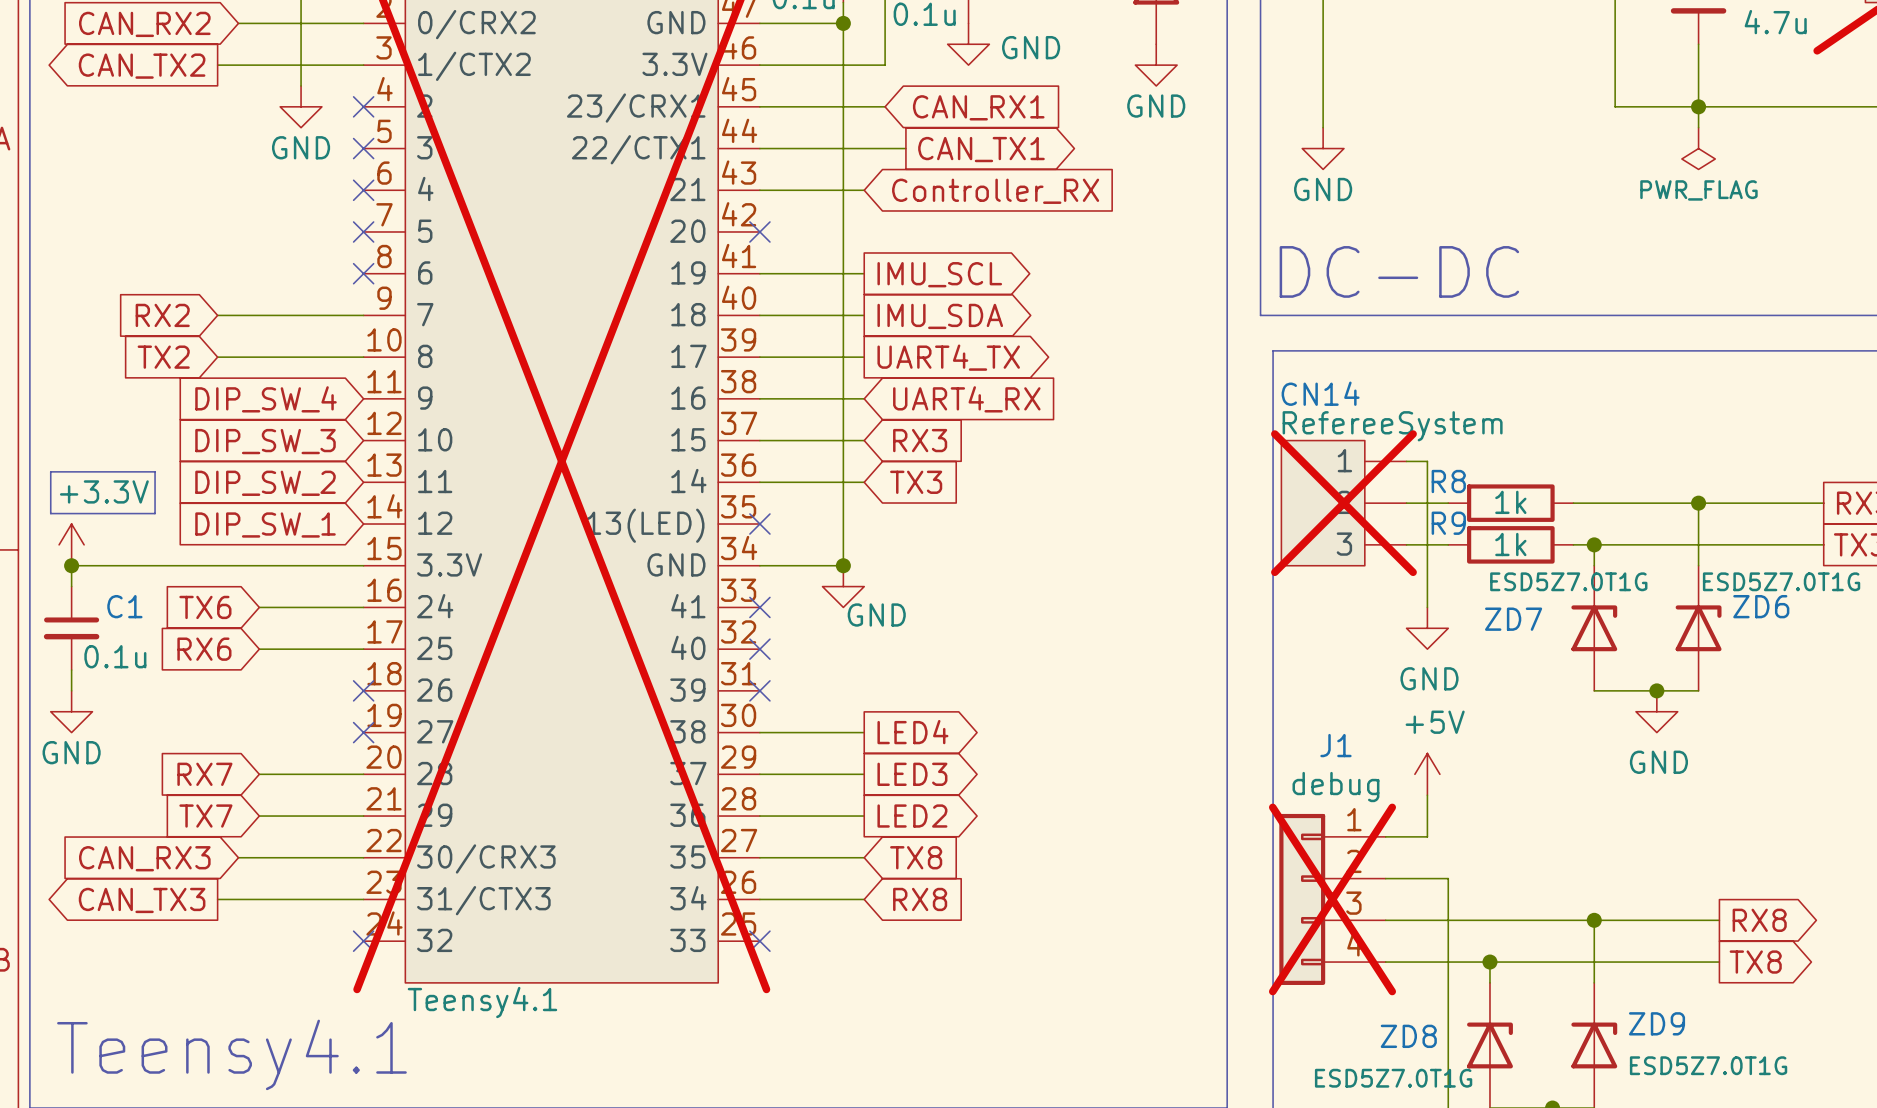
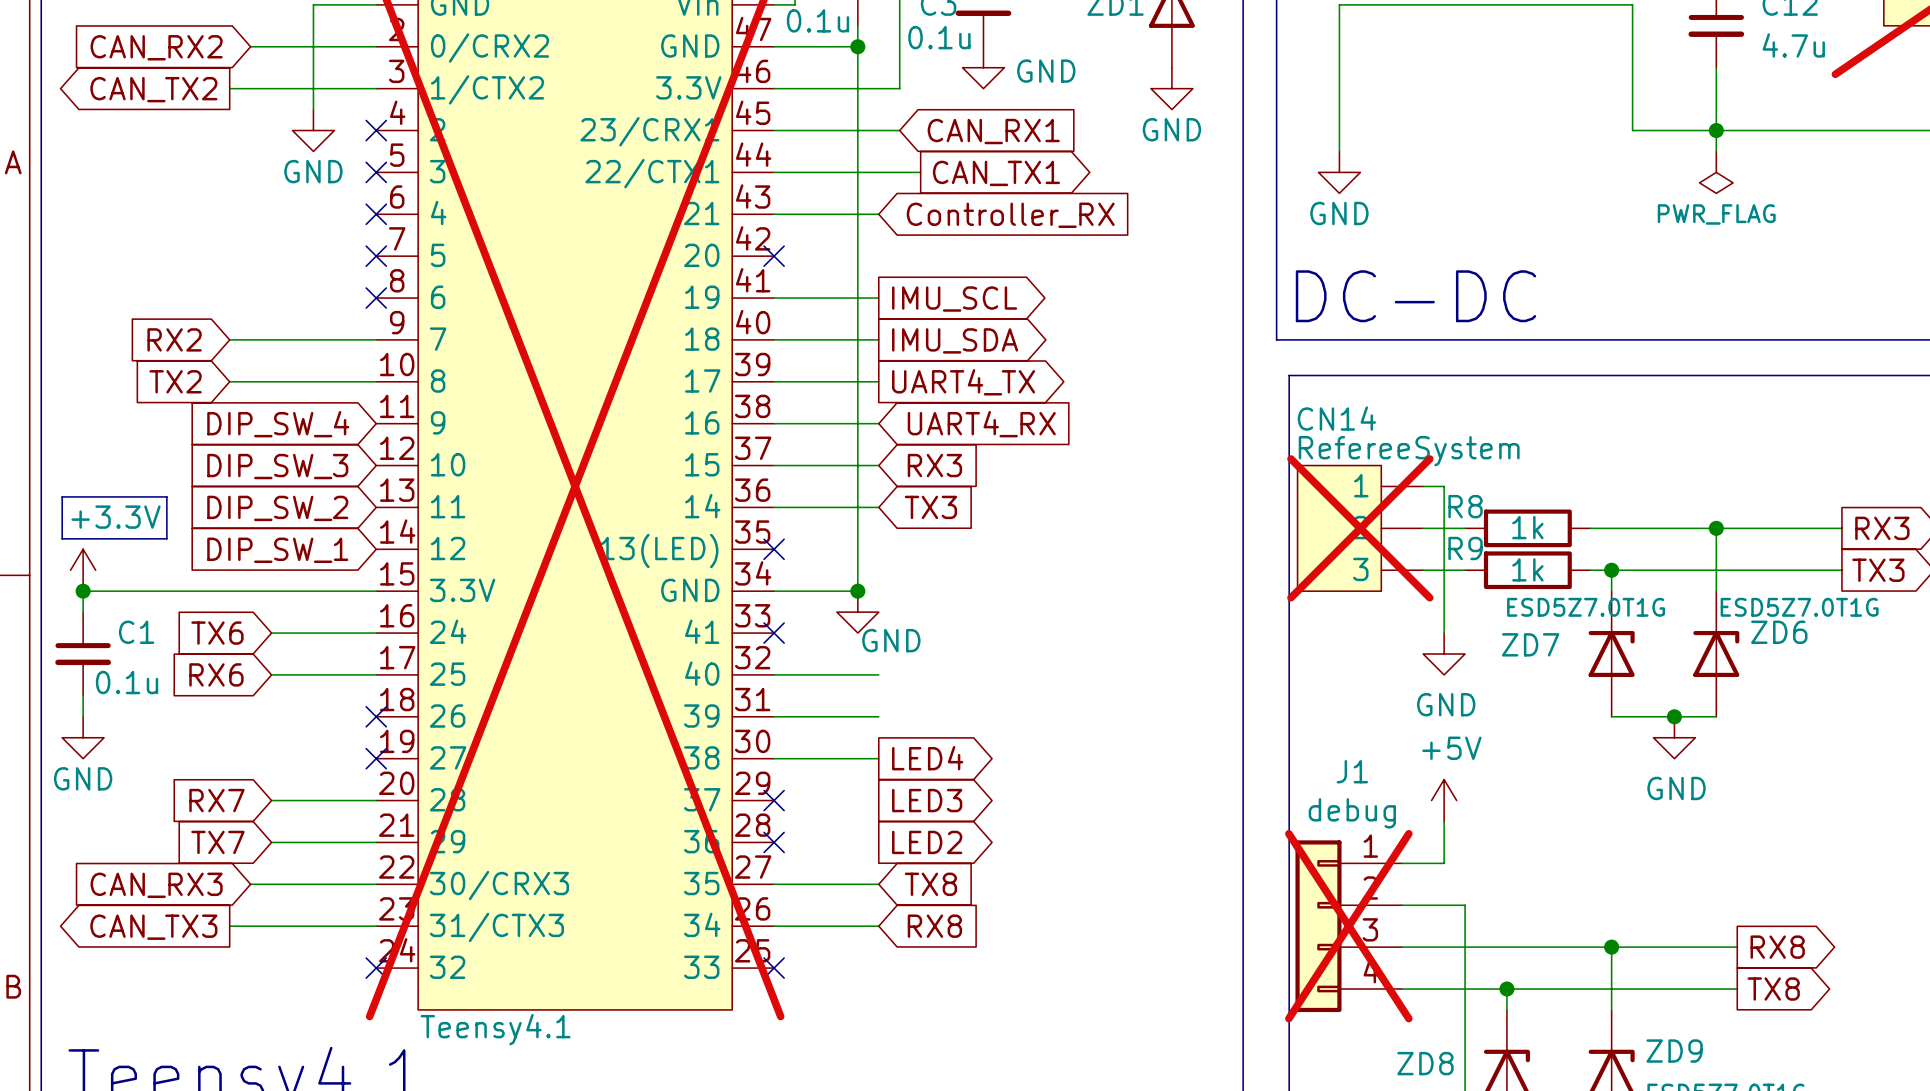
no-connect mark: (759, 649) -> none
no-connect mark: (759, 690) -> none
wire: (759, 774) (864, 774) -> (774, 674) (878, 674)
no-connect mark: none -> (774, 800)
wire: (759, 816) (864, 816) -> (774, 716) (878, 716)
no-connect mark: none -> (774, 842)

